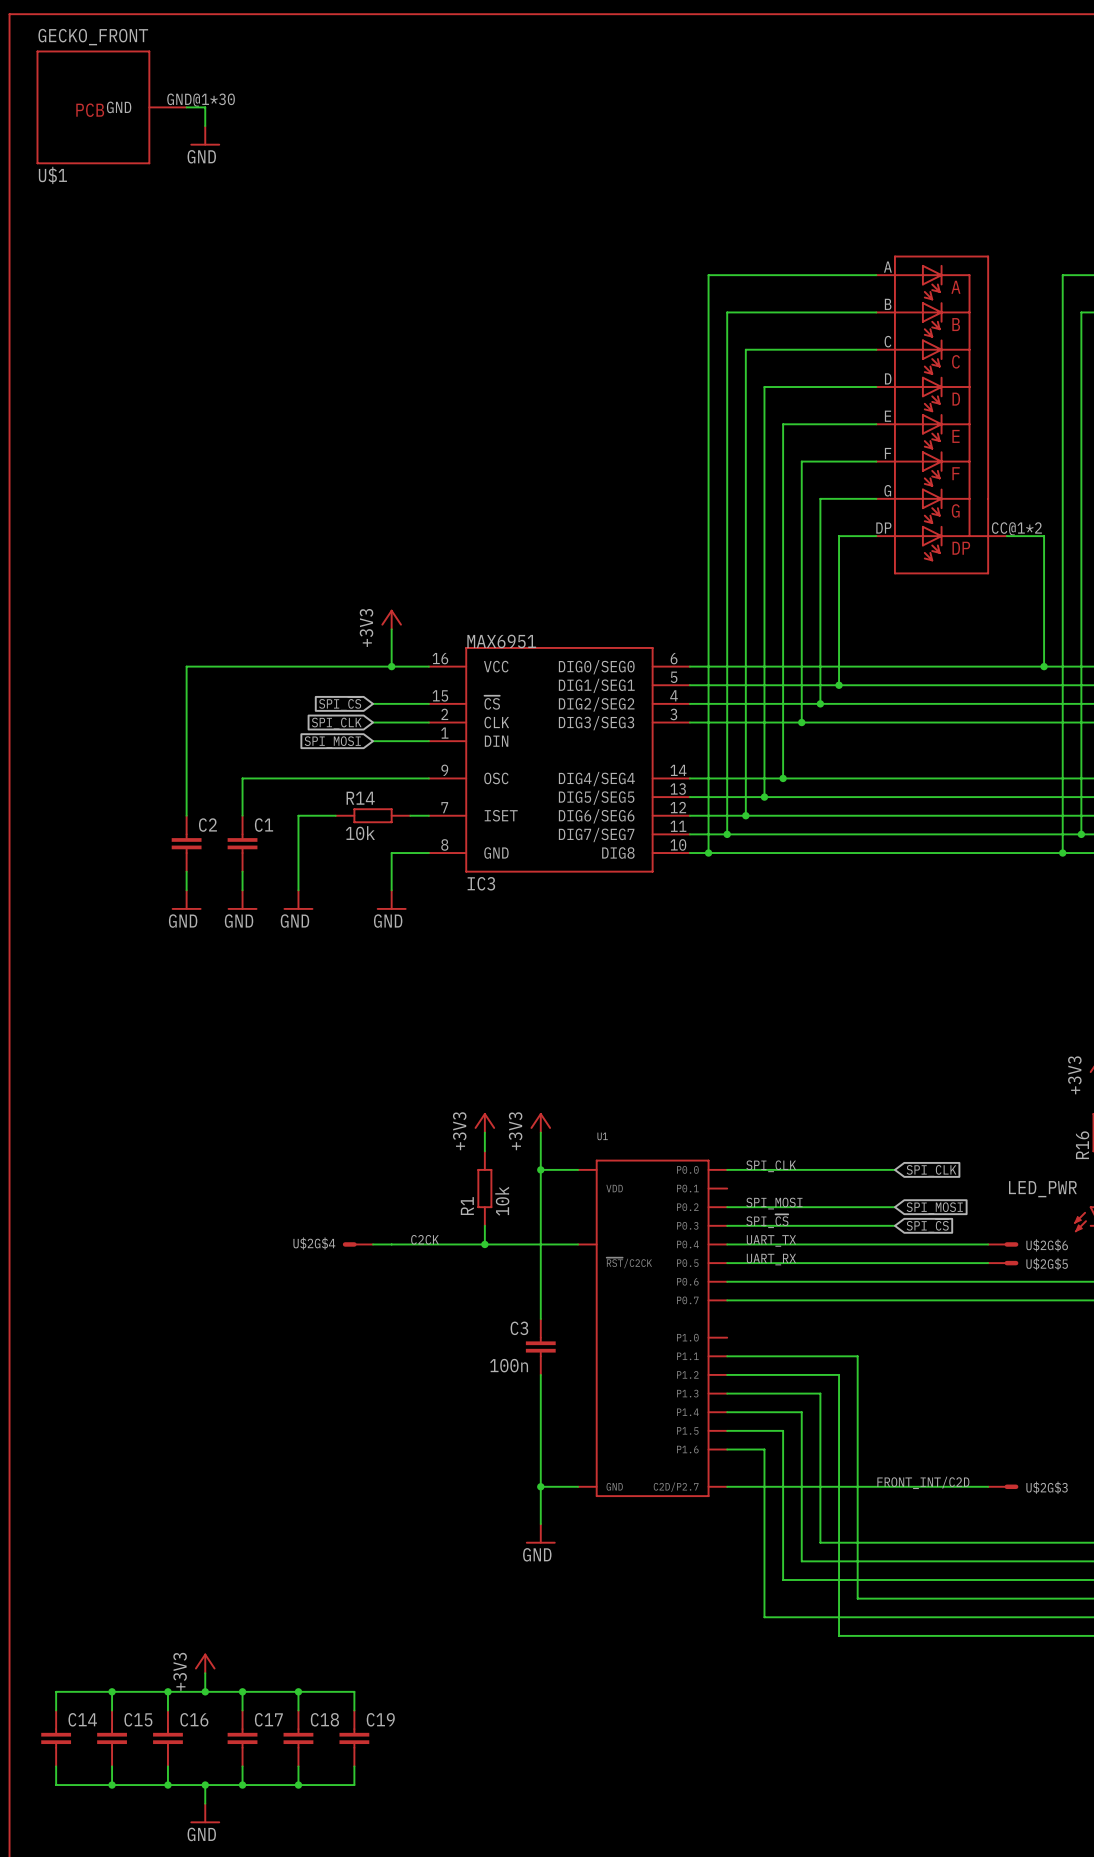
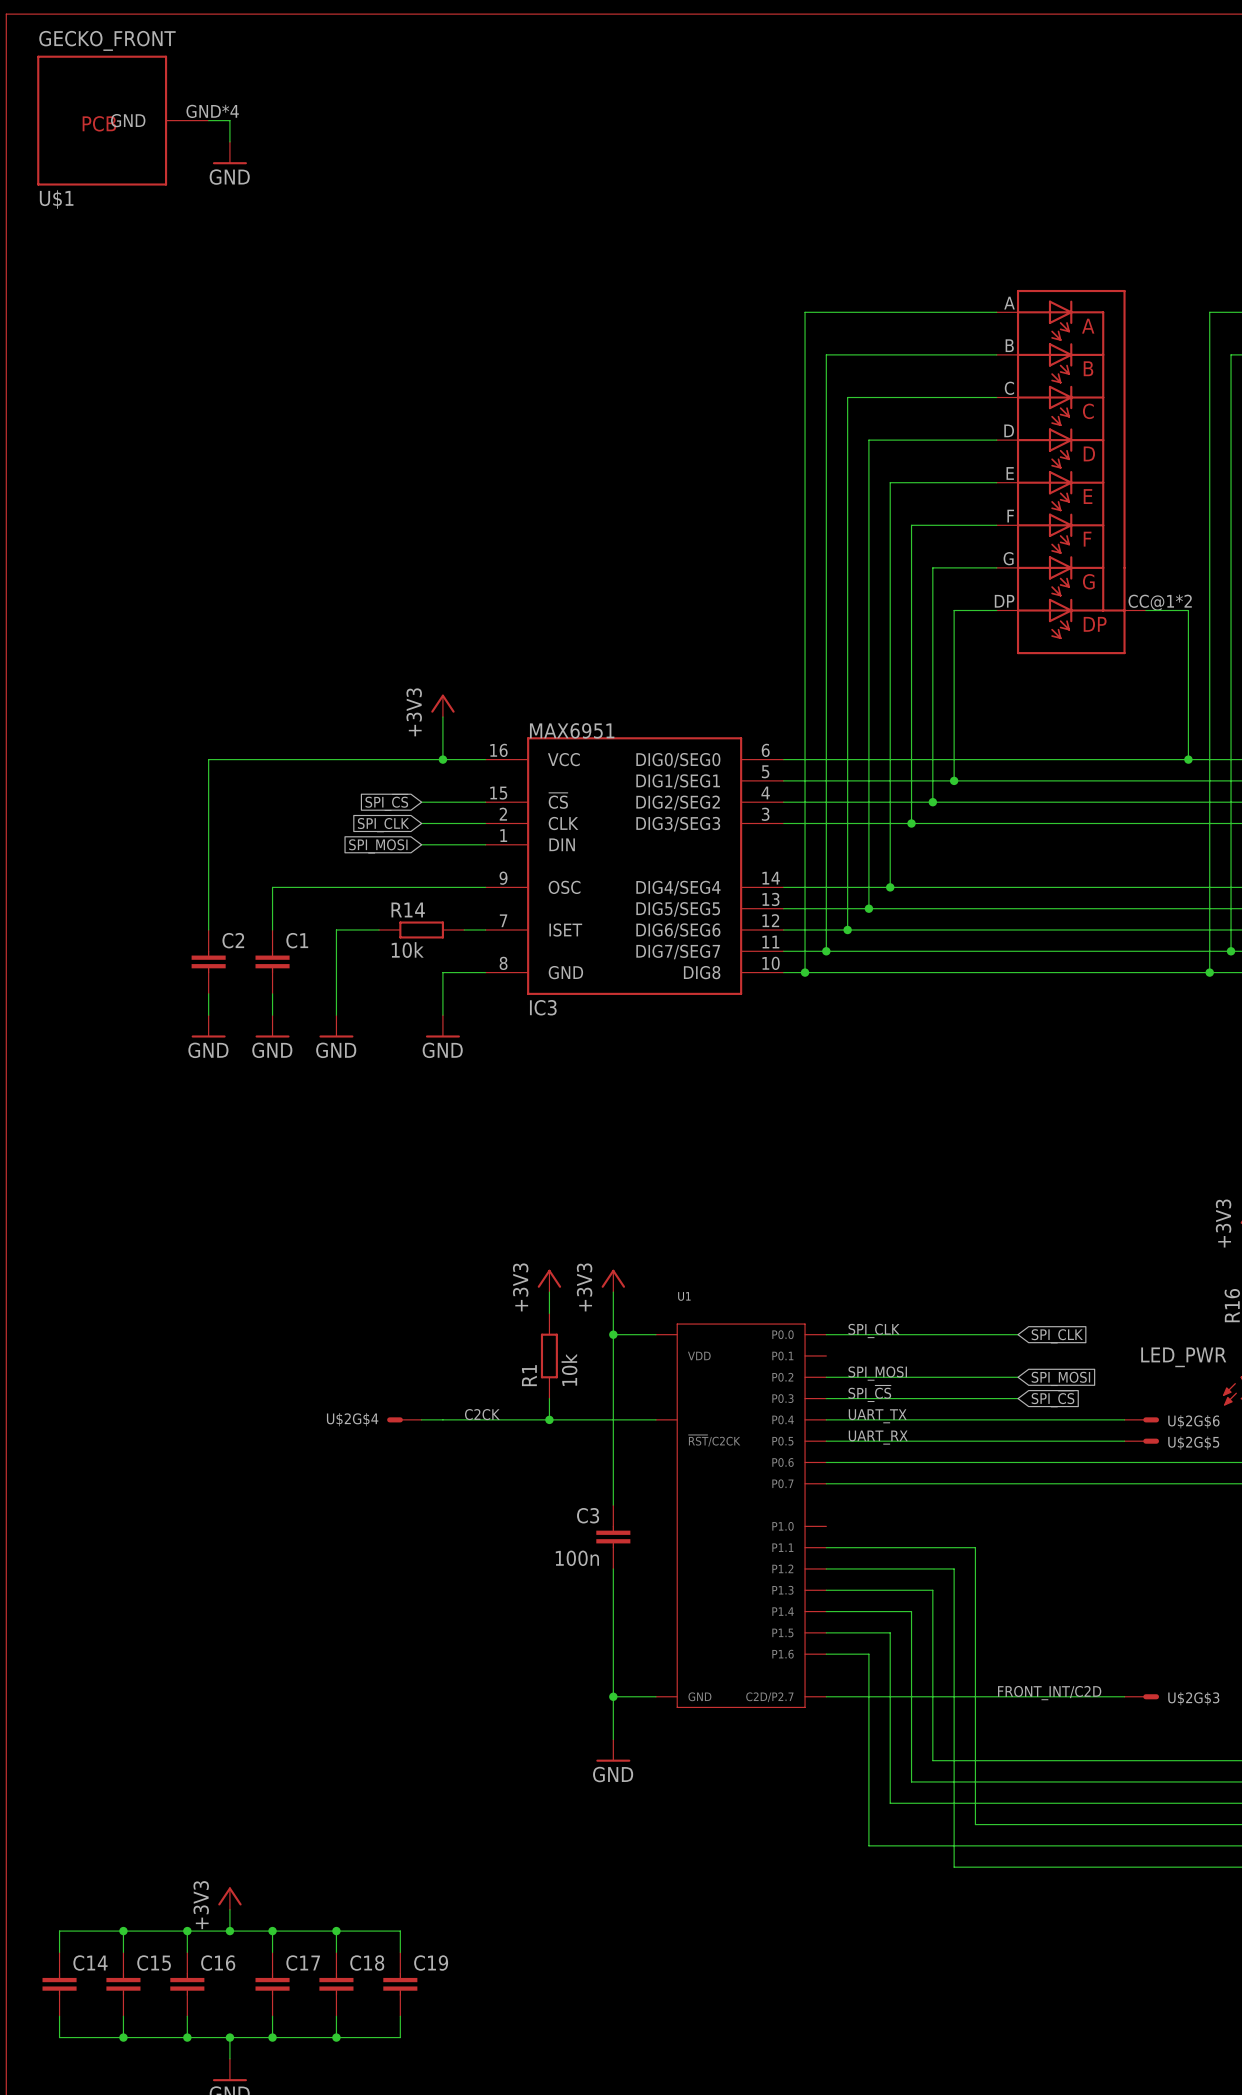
U$1 pin number: GND@1*30 (201, 100) -> GND*4 (212, 111)

